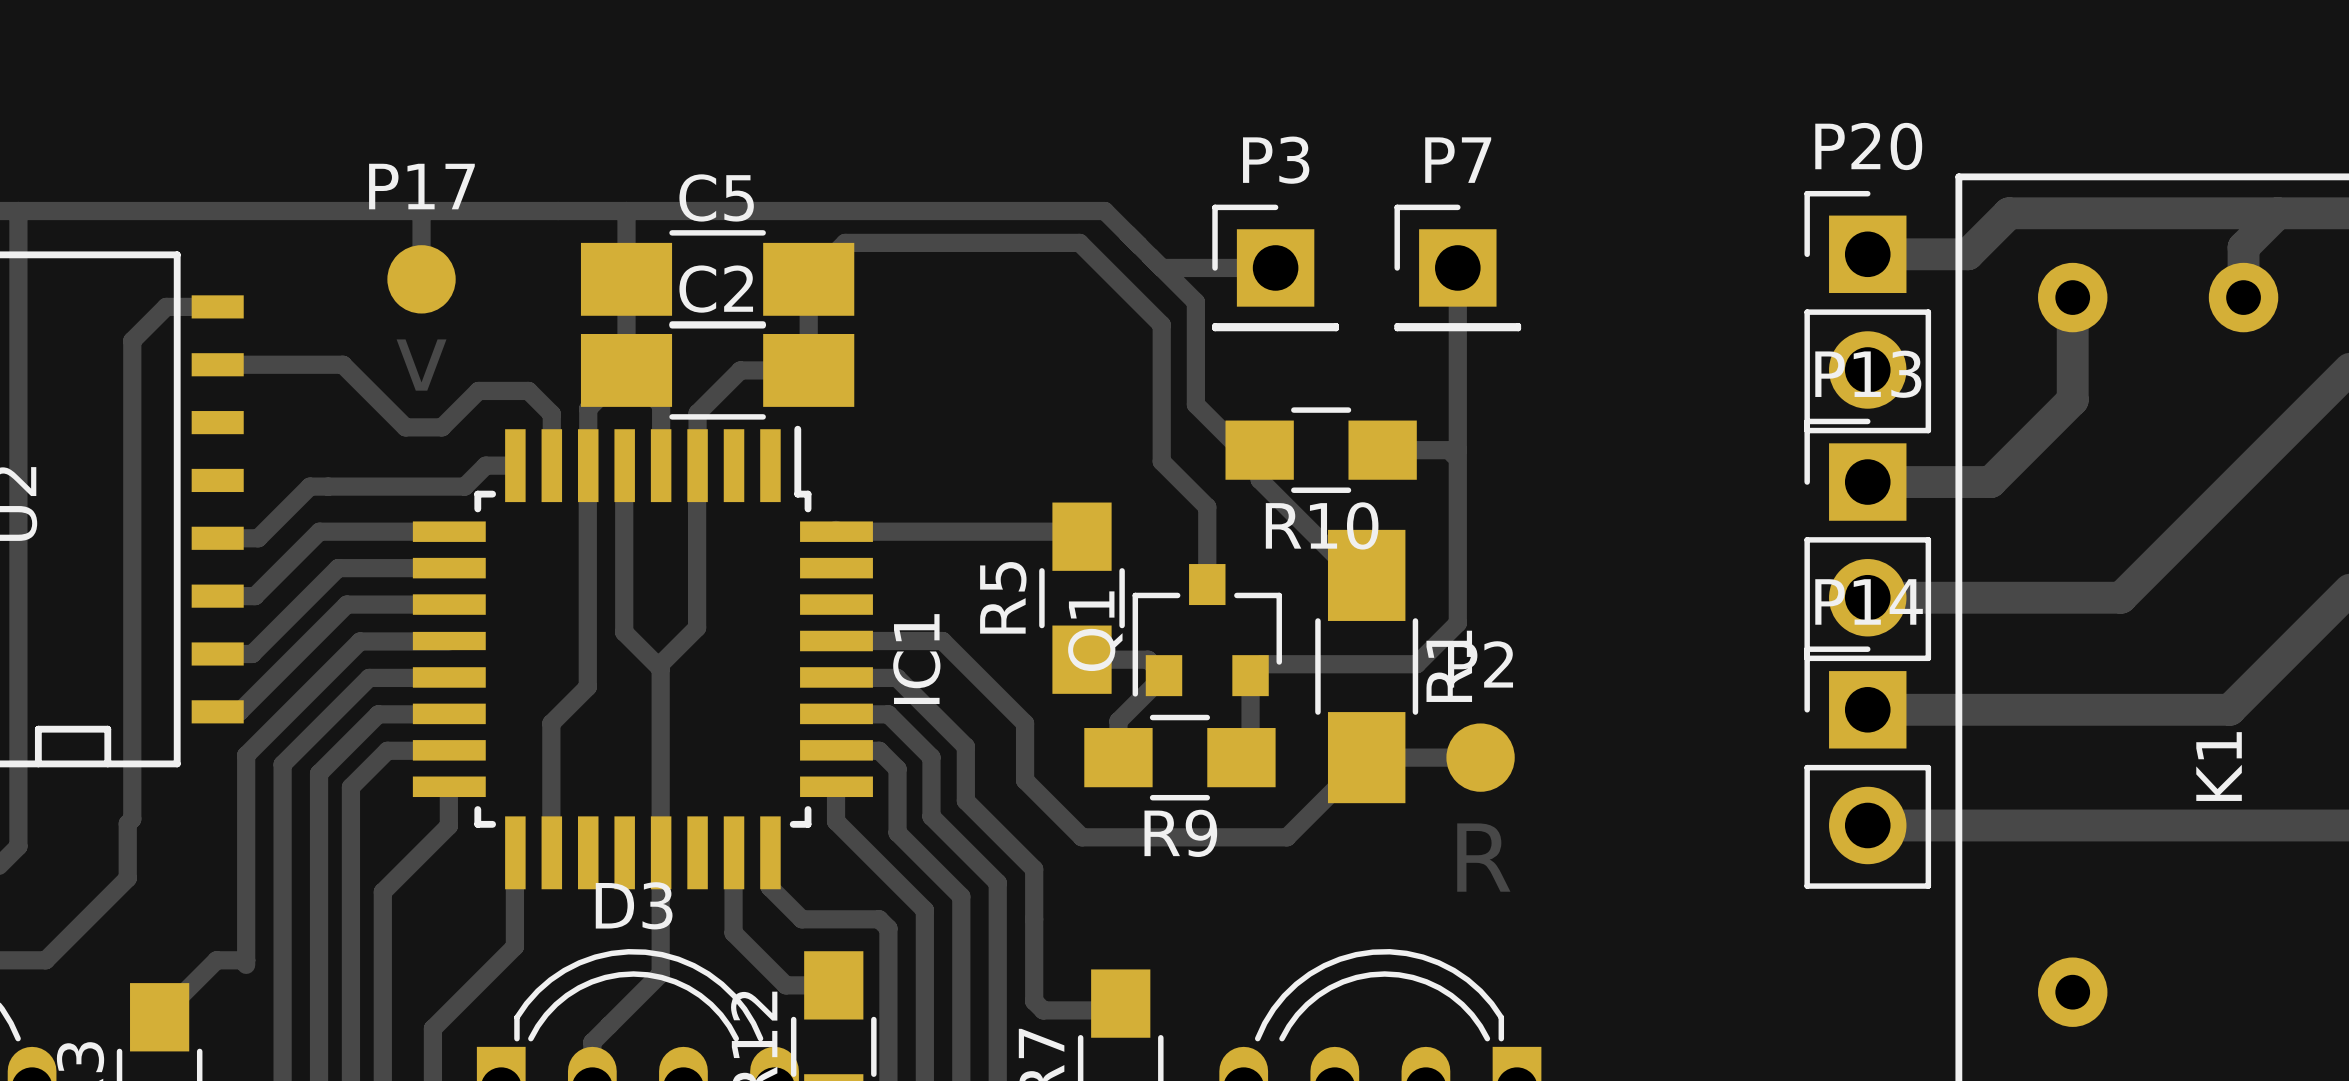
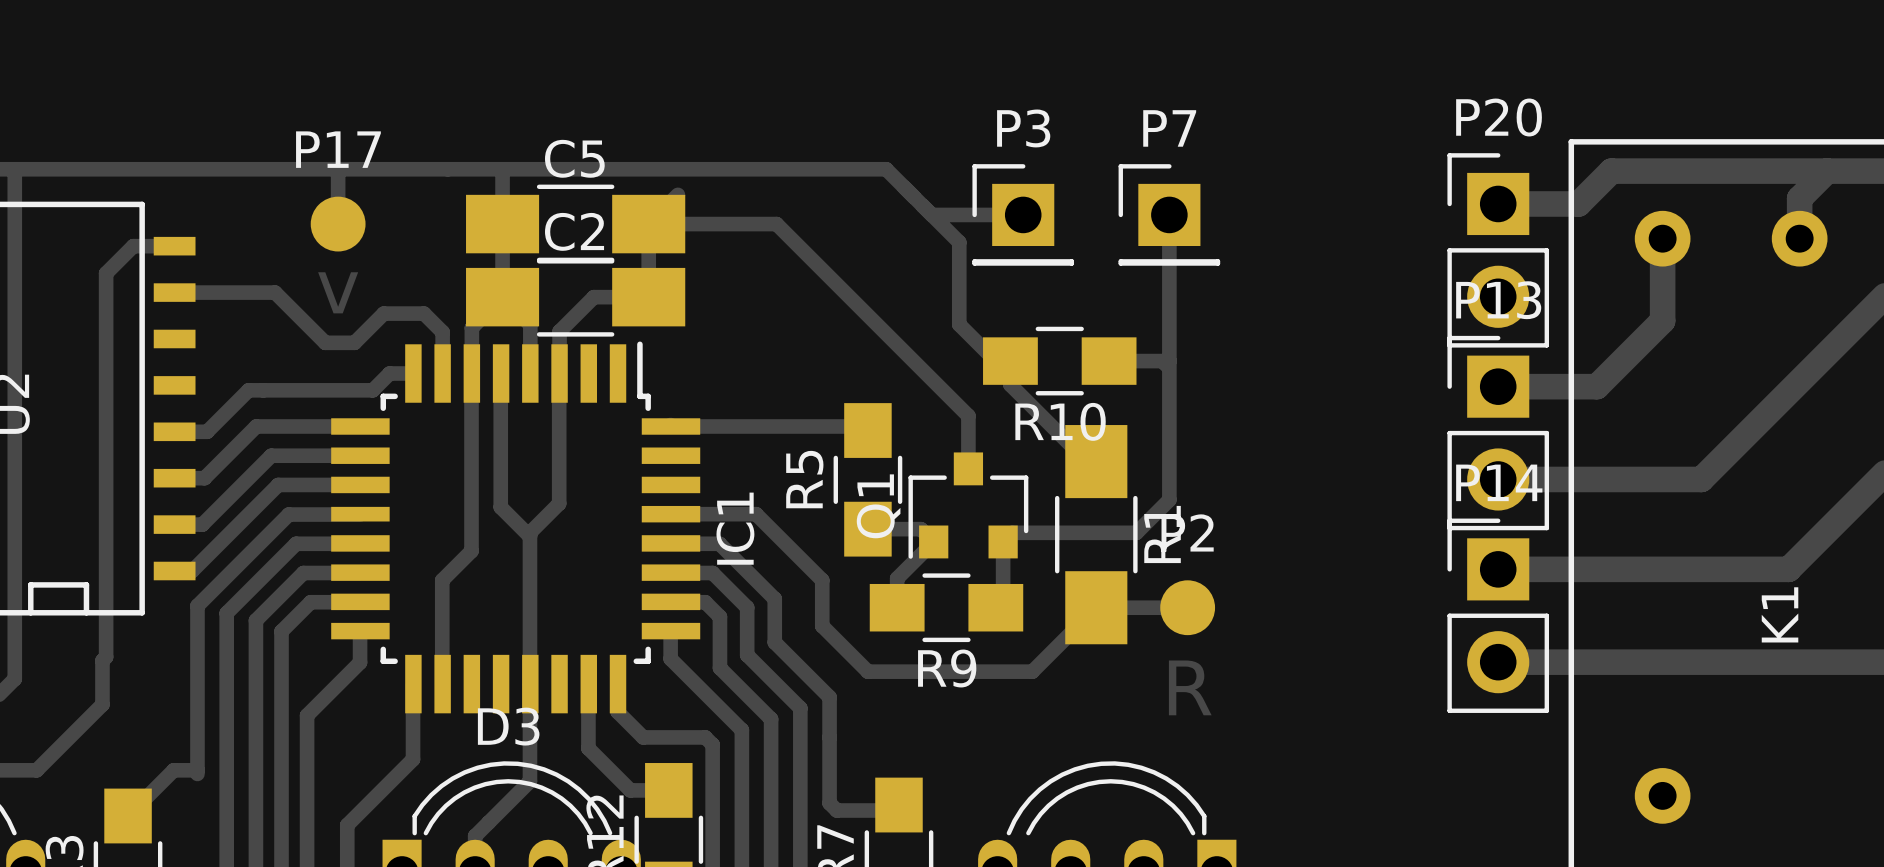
track: (845, 242) (1079, 242) (1161, 324) (1161, 461) (1207, 507) (1207, 518) -> (648, 224) (776, 224) (968, 415)

